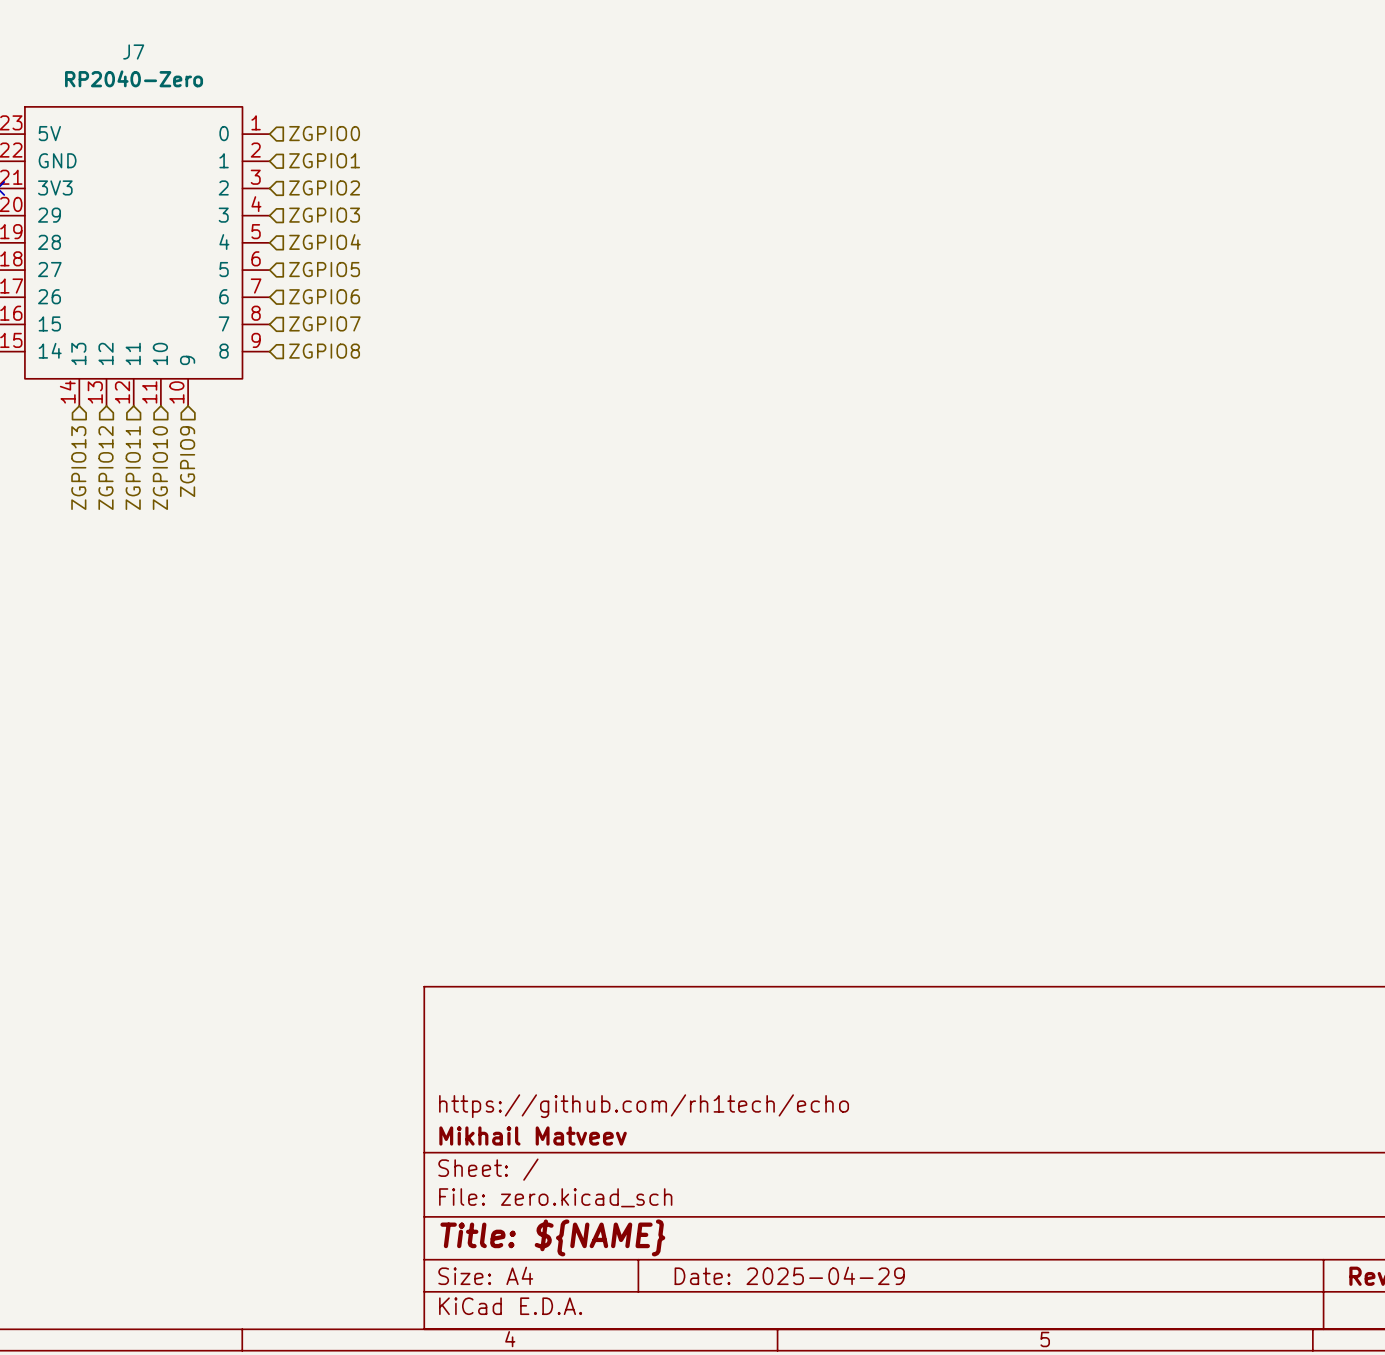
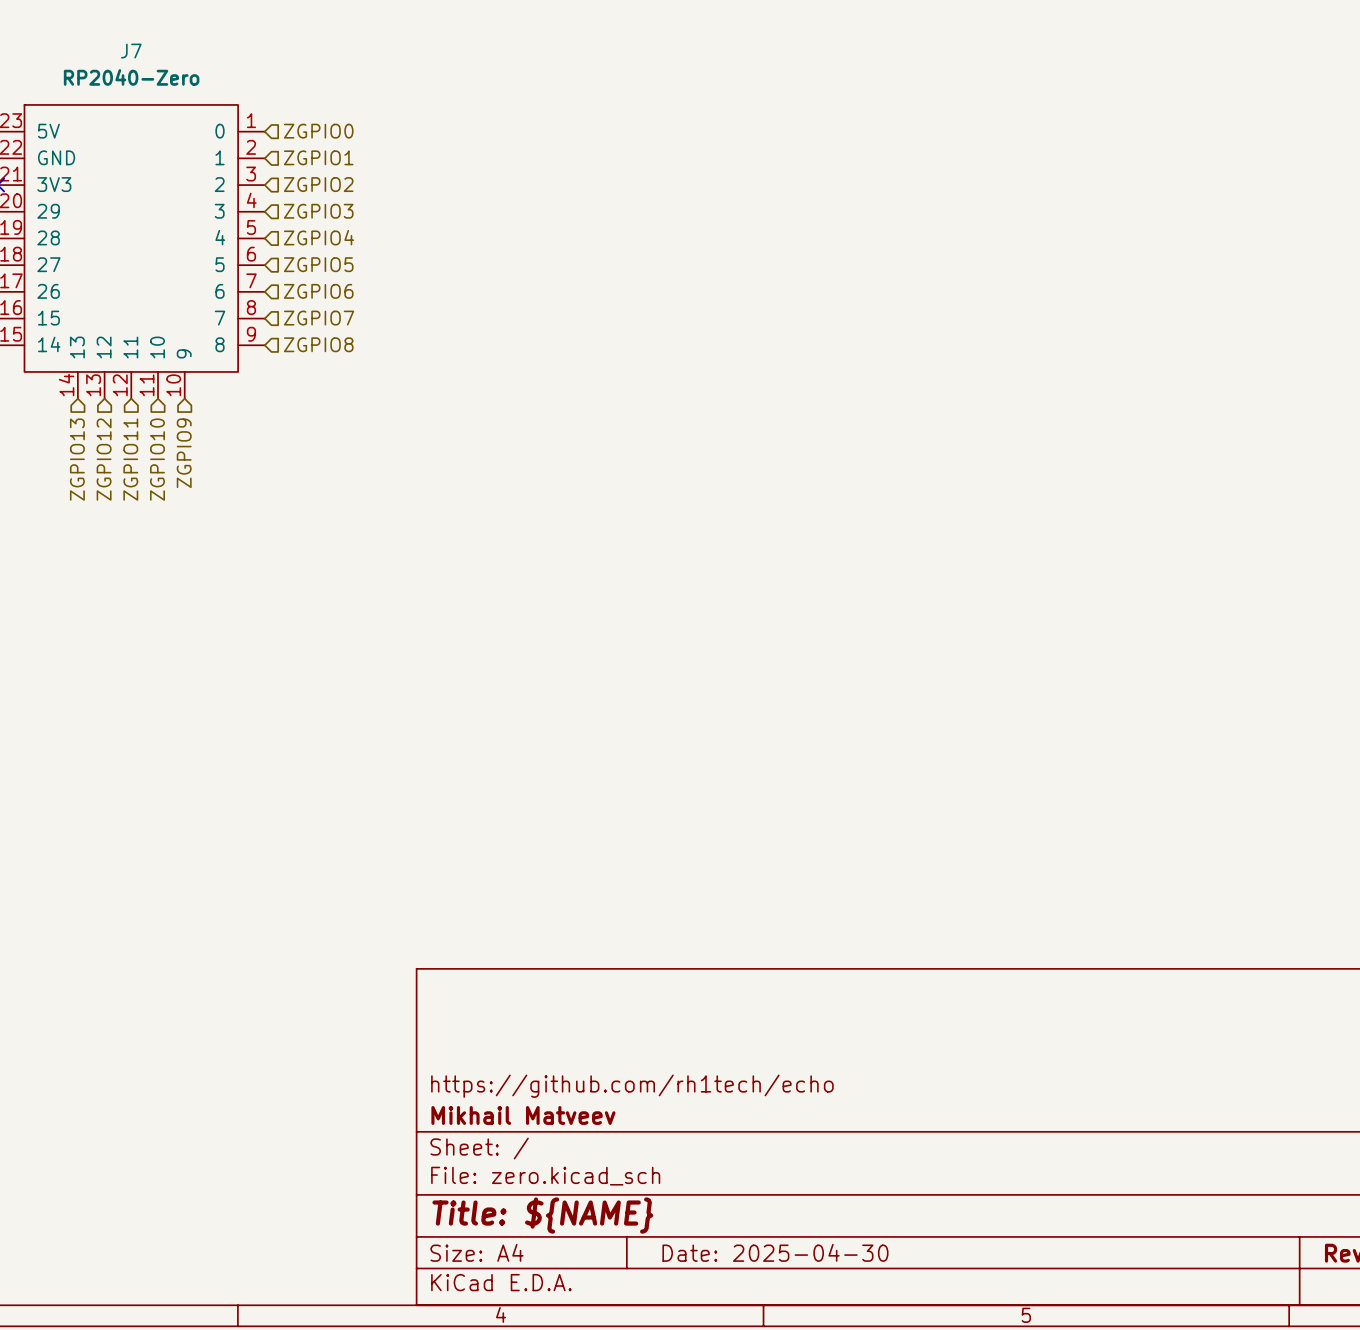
title block: Date: 2025-04-29 (789, 1275) -> Date: 2025-04-30 (775, 1252)

